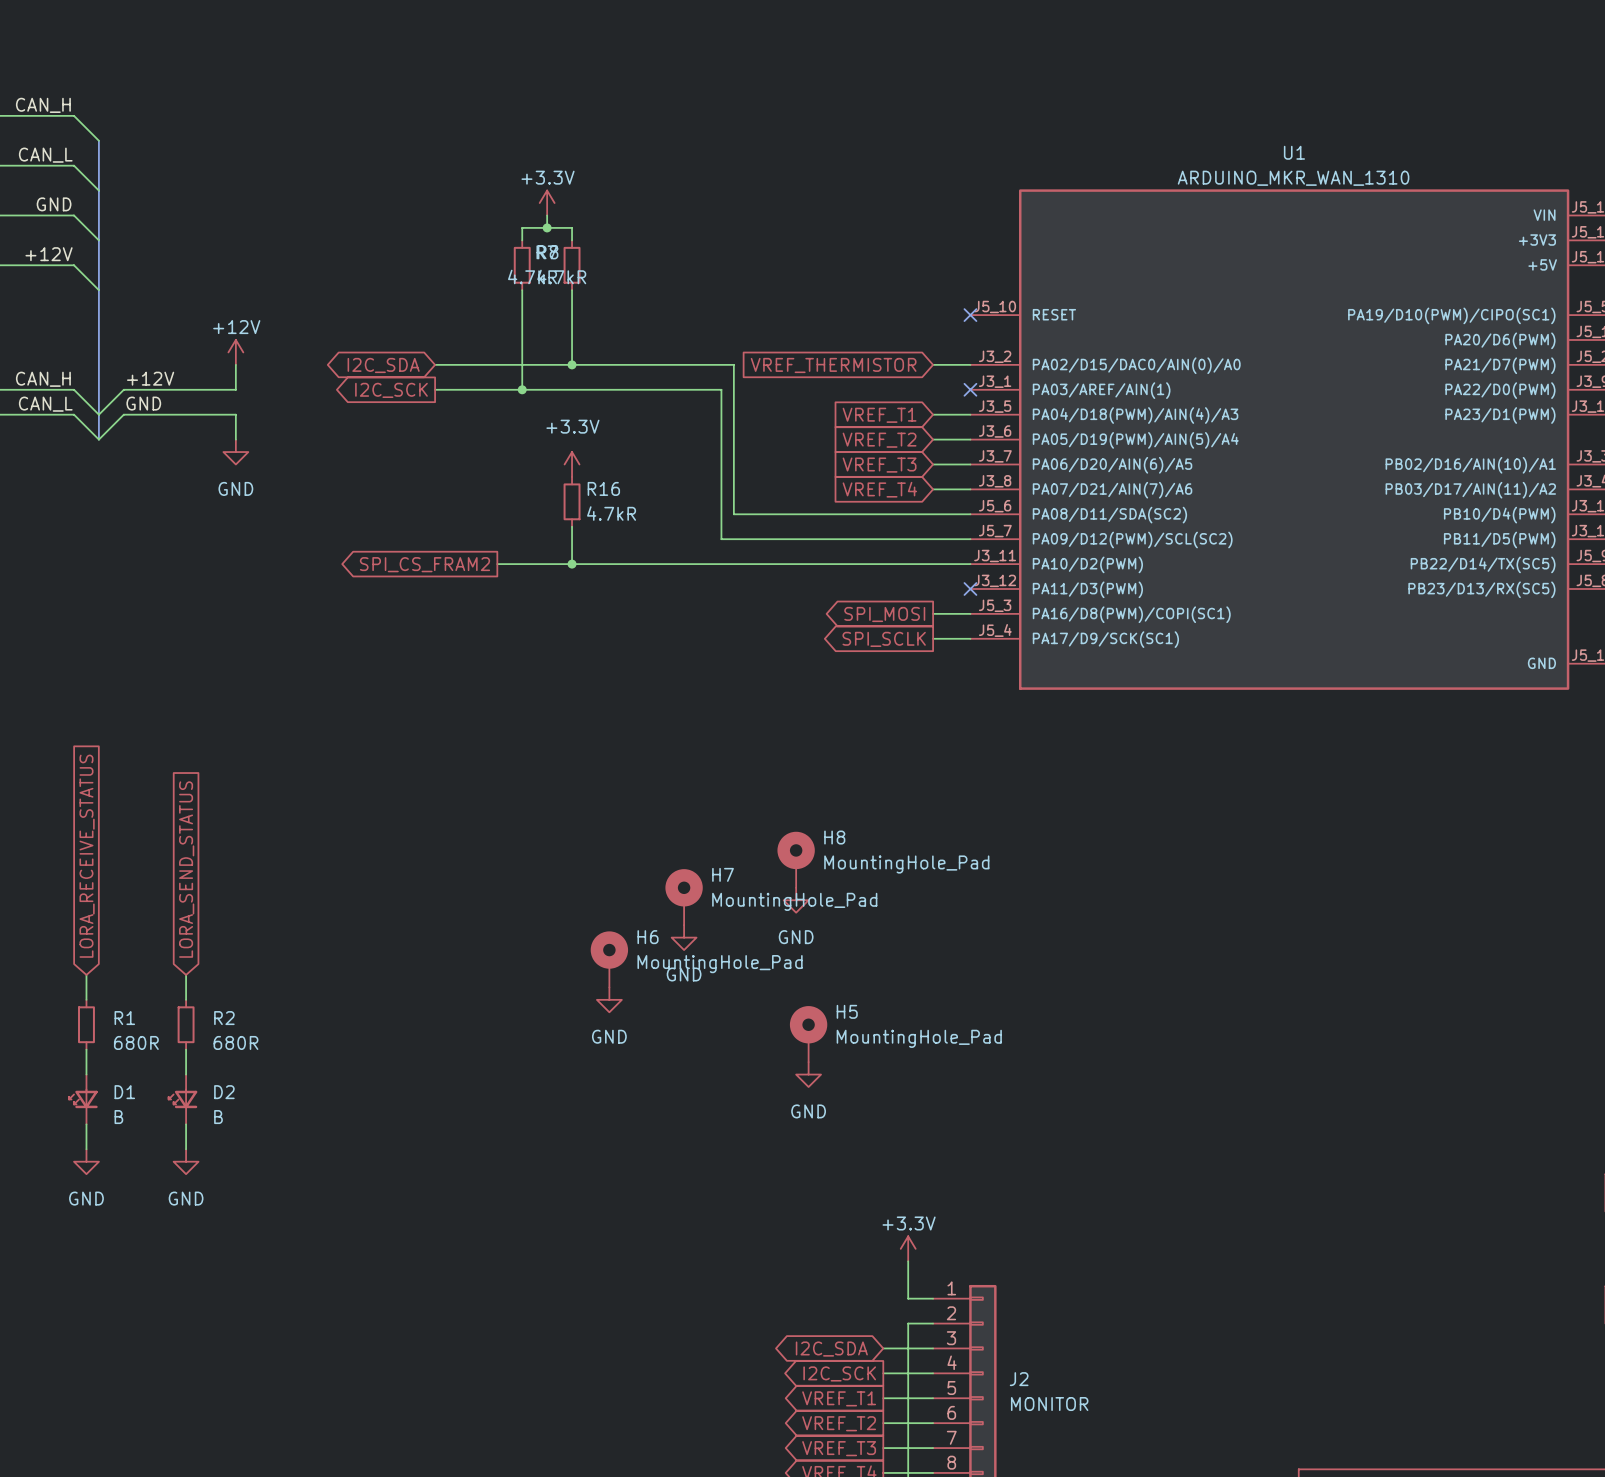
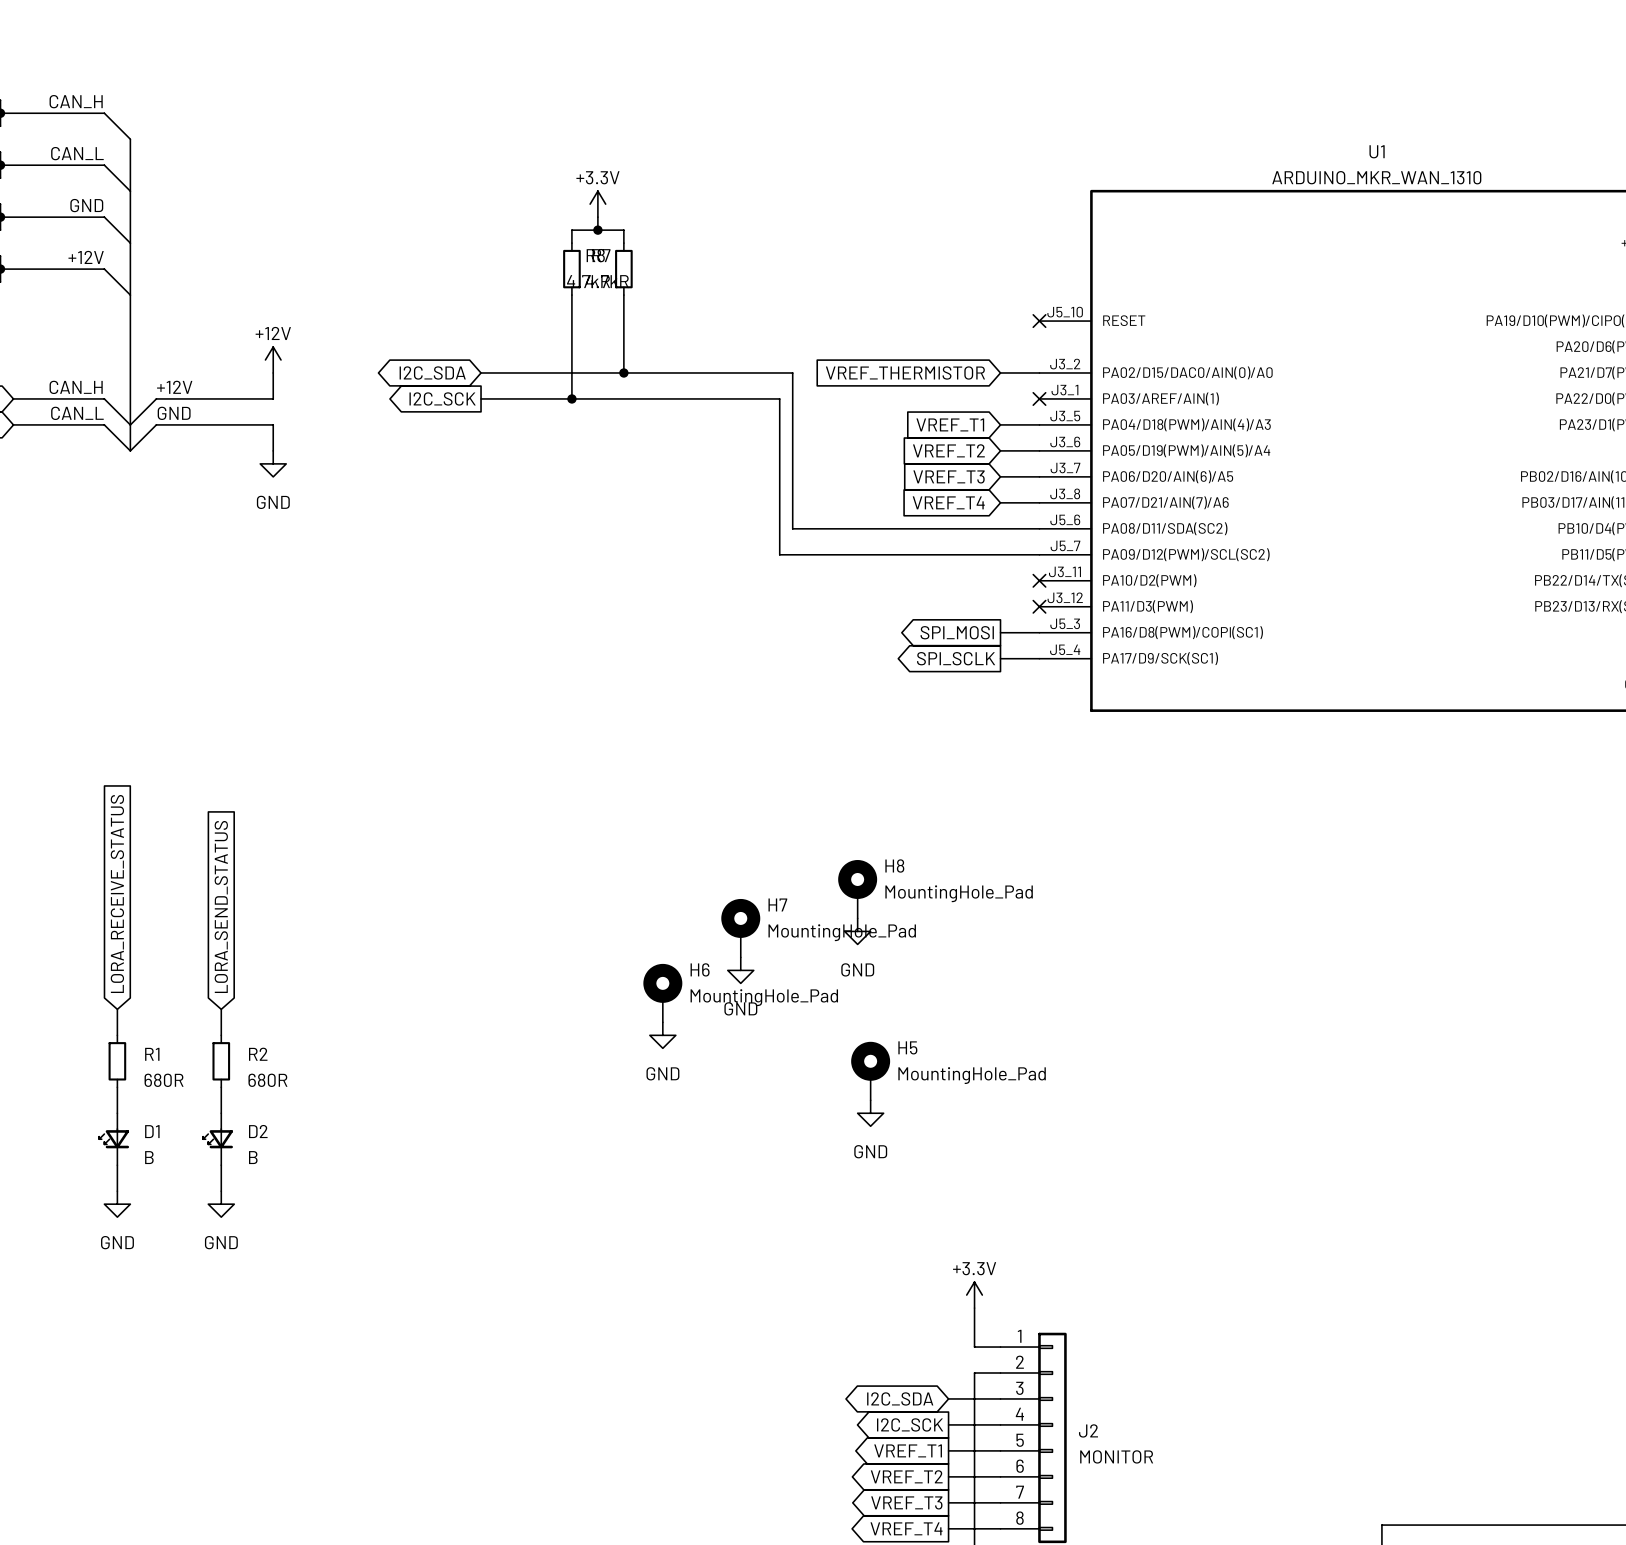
power symbol: +3.3V (572, 464) -> none
R16: 4.7kR (572, 501) -> none
wire: (572, 526) (572, 564) -> none
global label: SPI_CS_FRAM2 (424, 564) -> none
wire: (497, 564) (970, 564) -> none
junction: (572, 564) -> none
no-connect mark: none -> (1039, 580)

